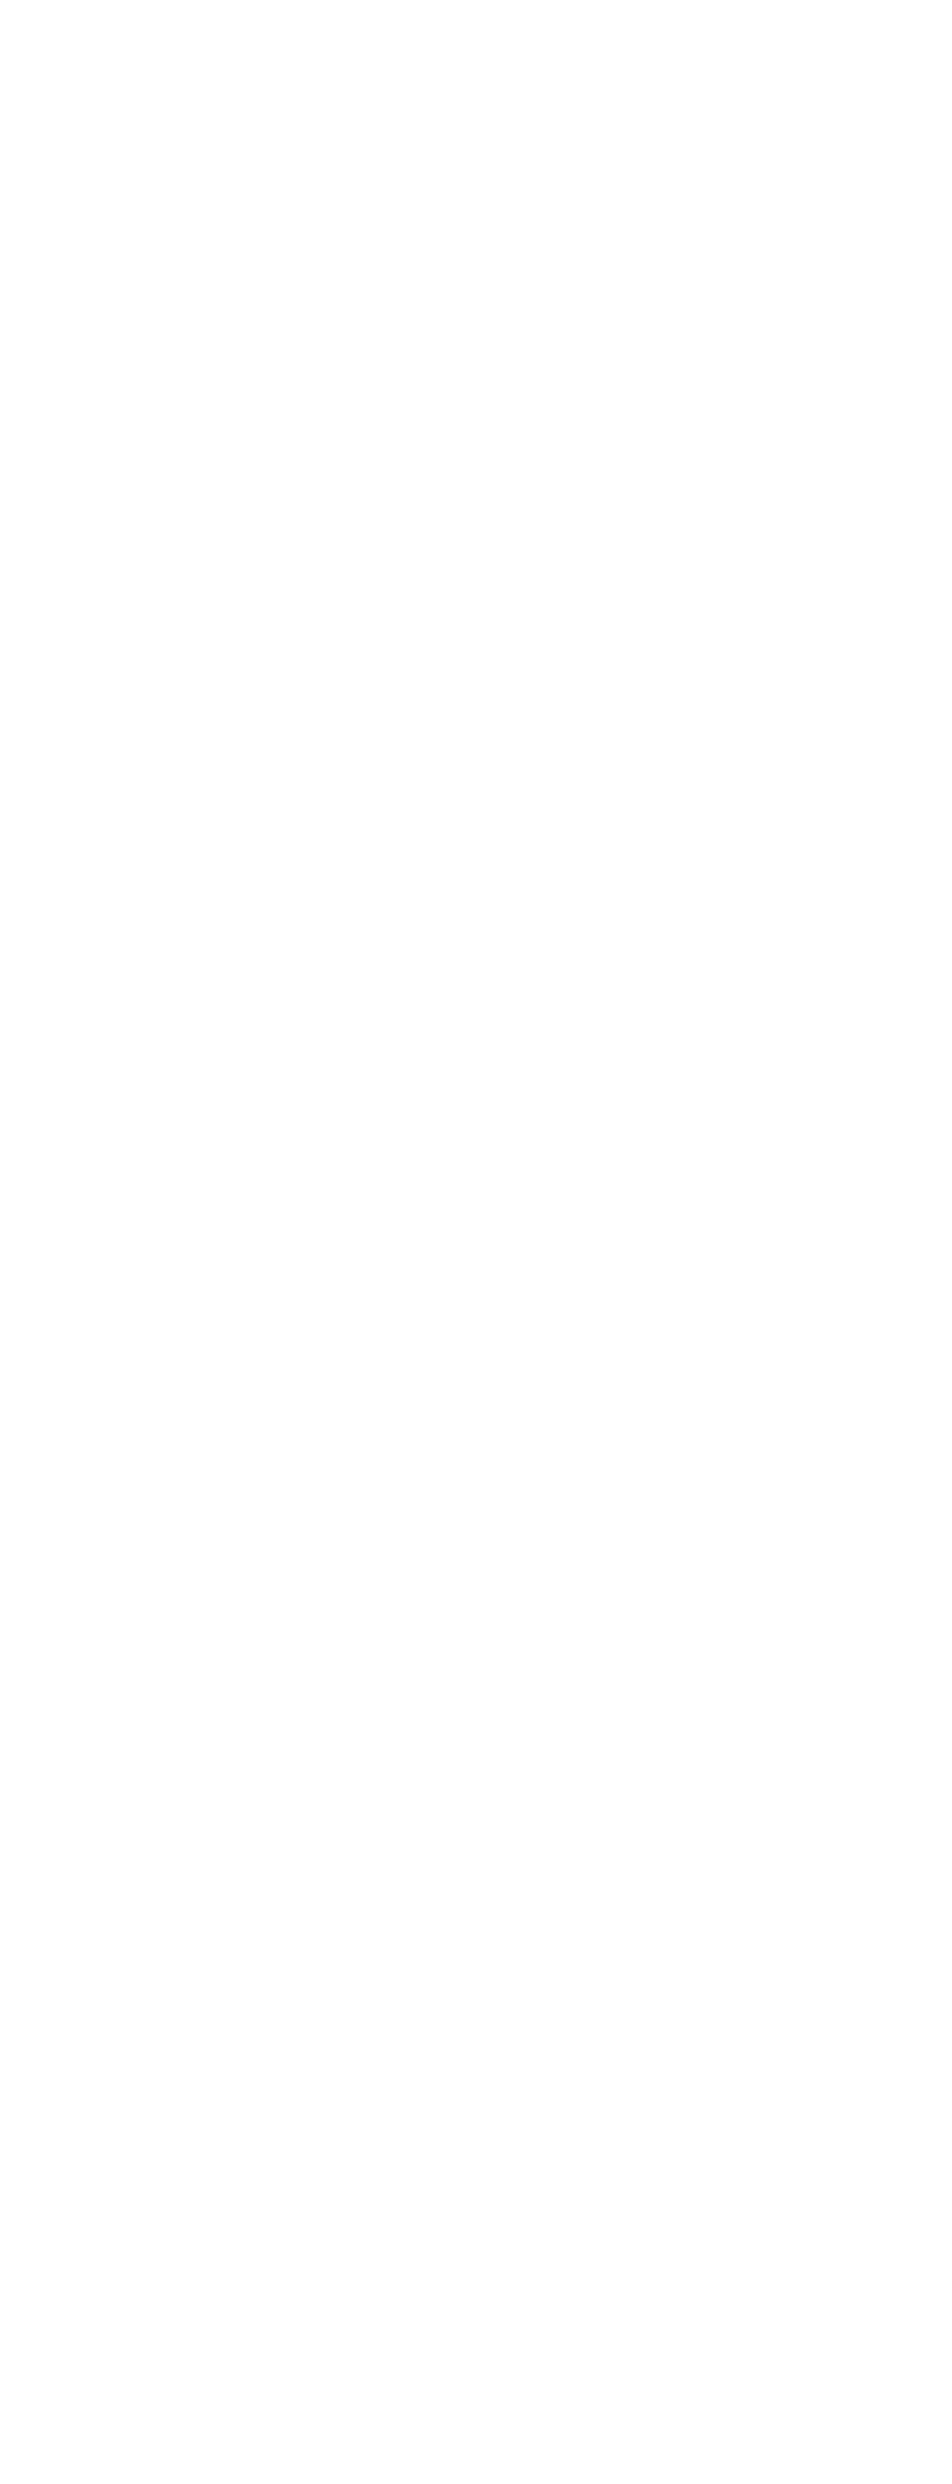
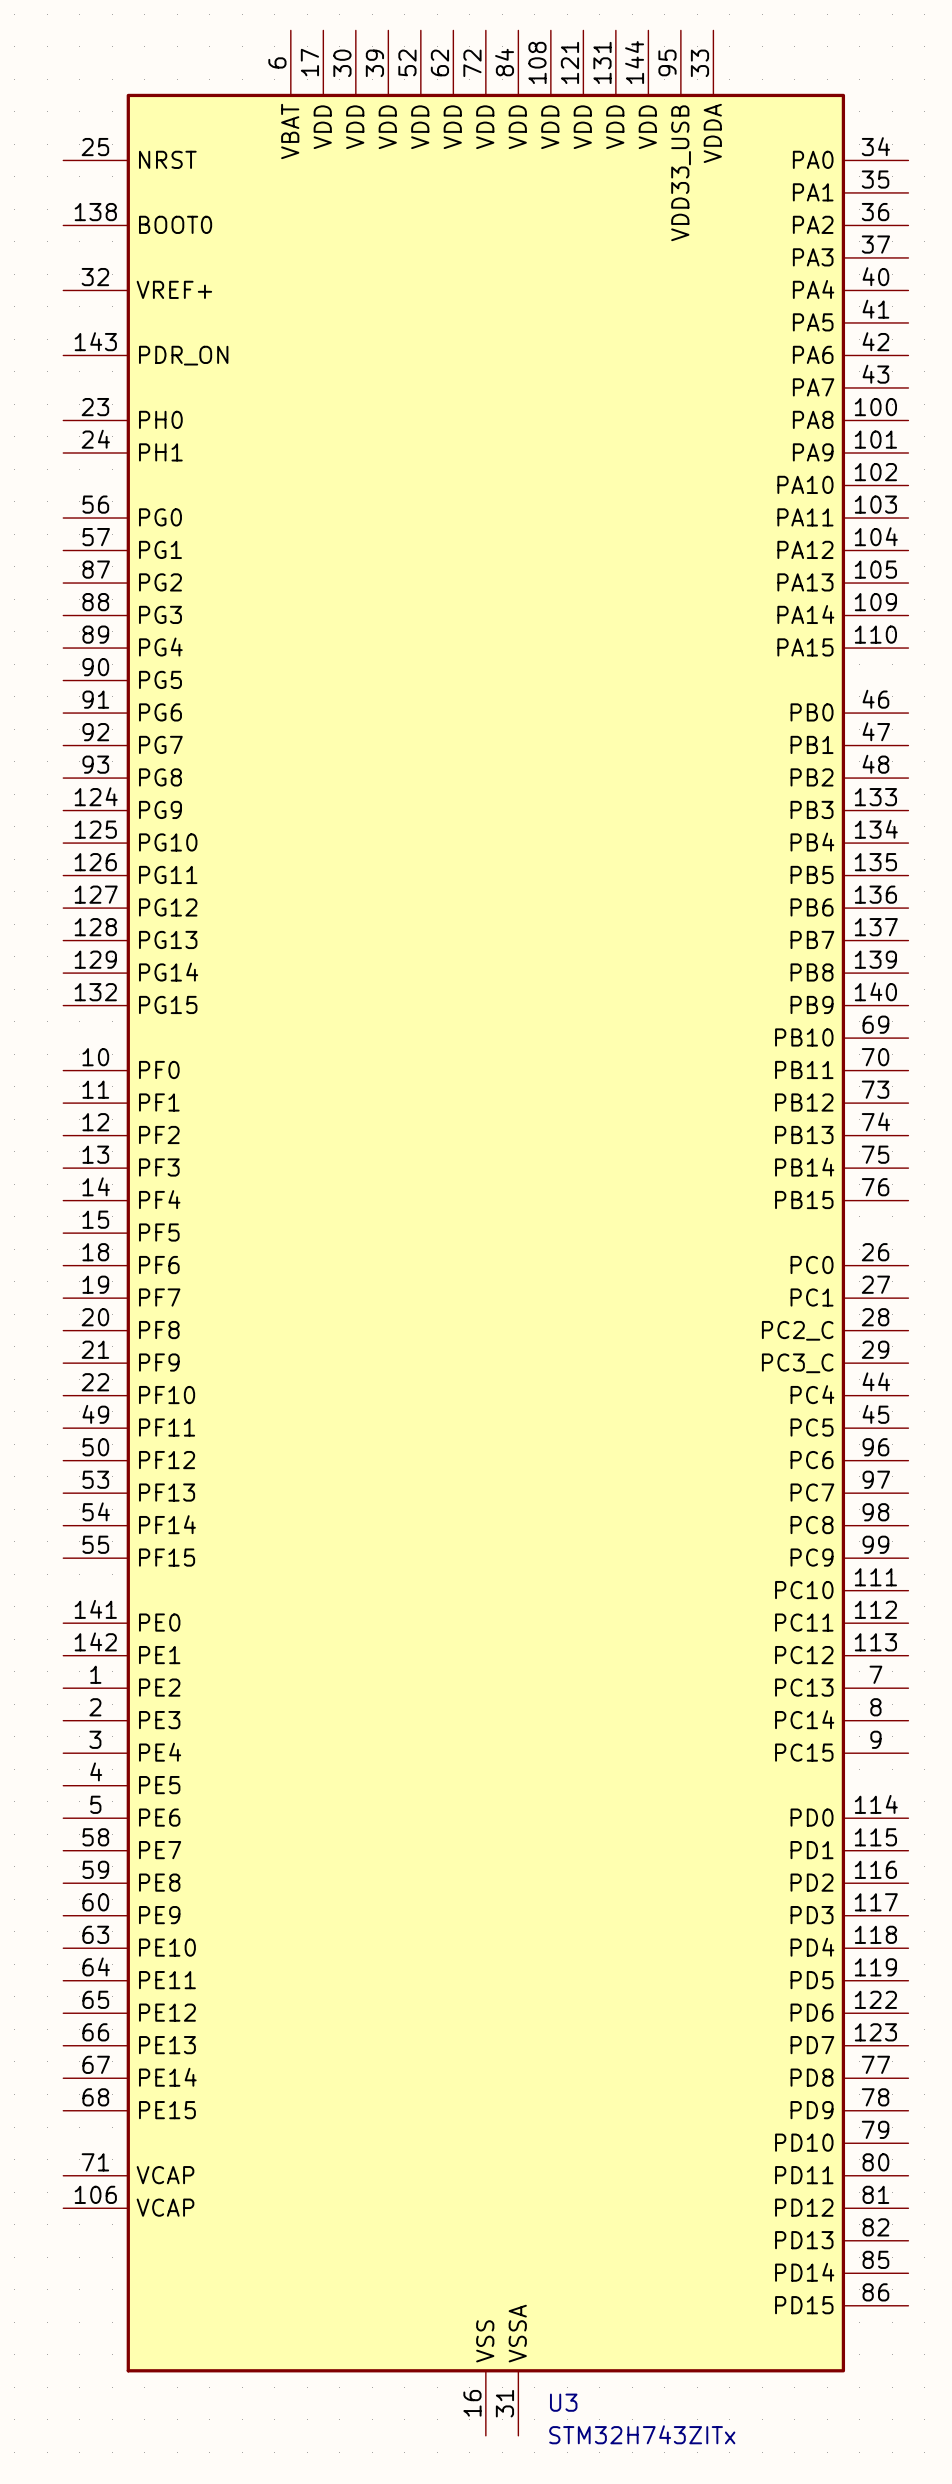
U3: none -> STM32H743ZITx (485, 1233)

